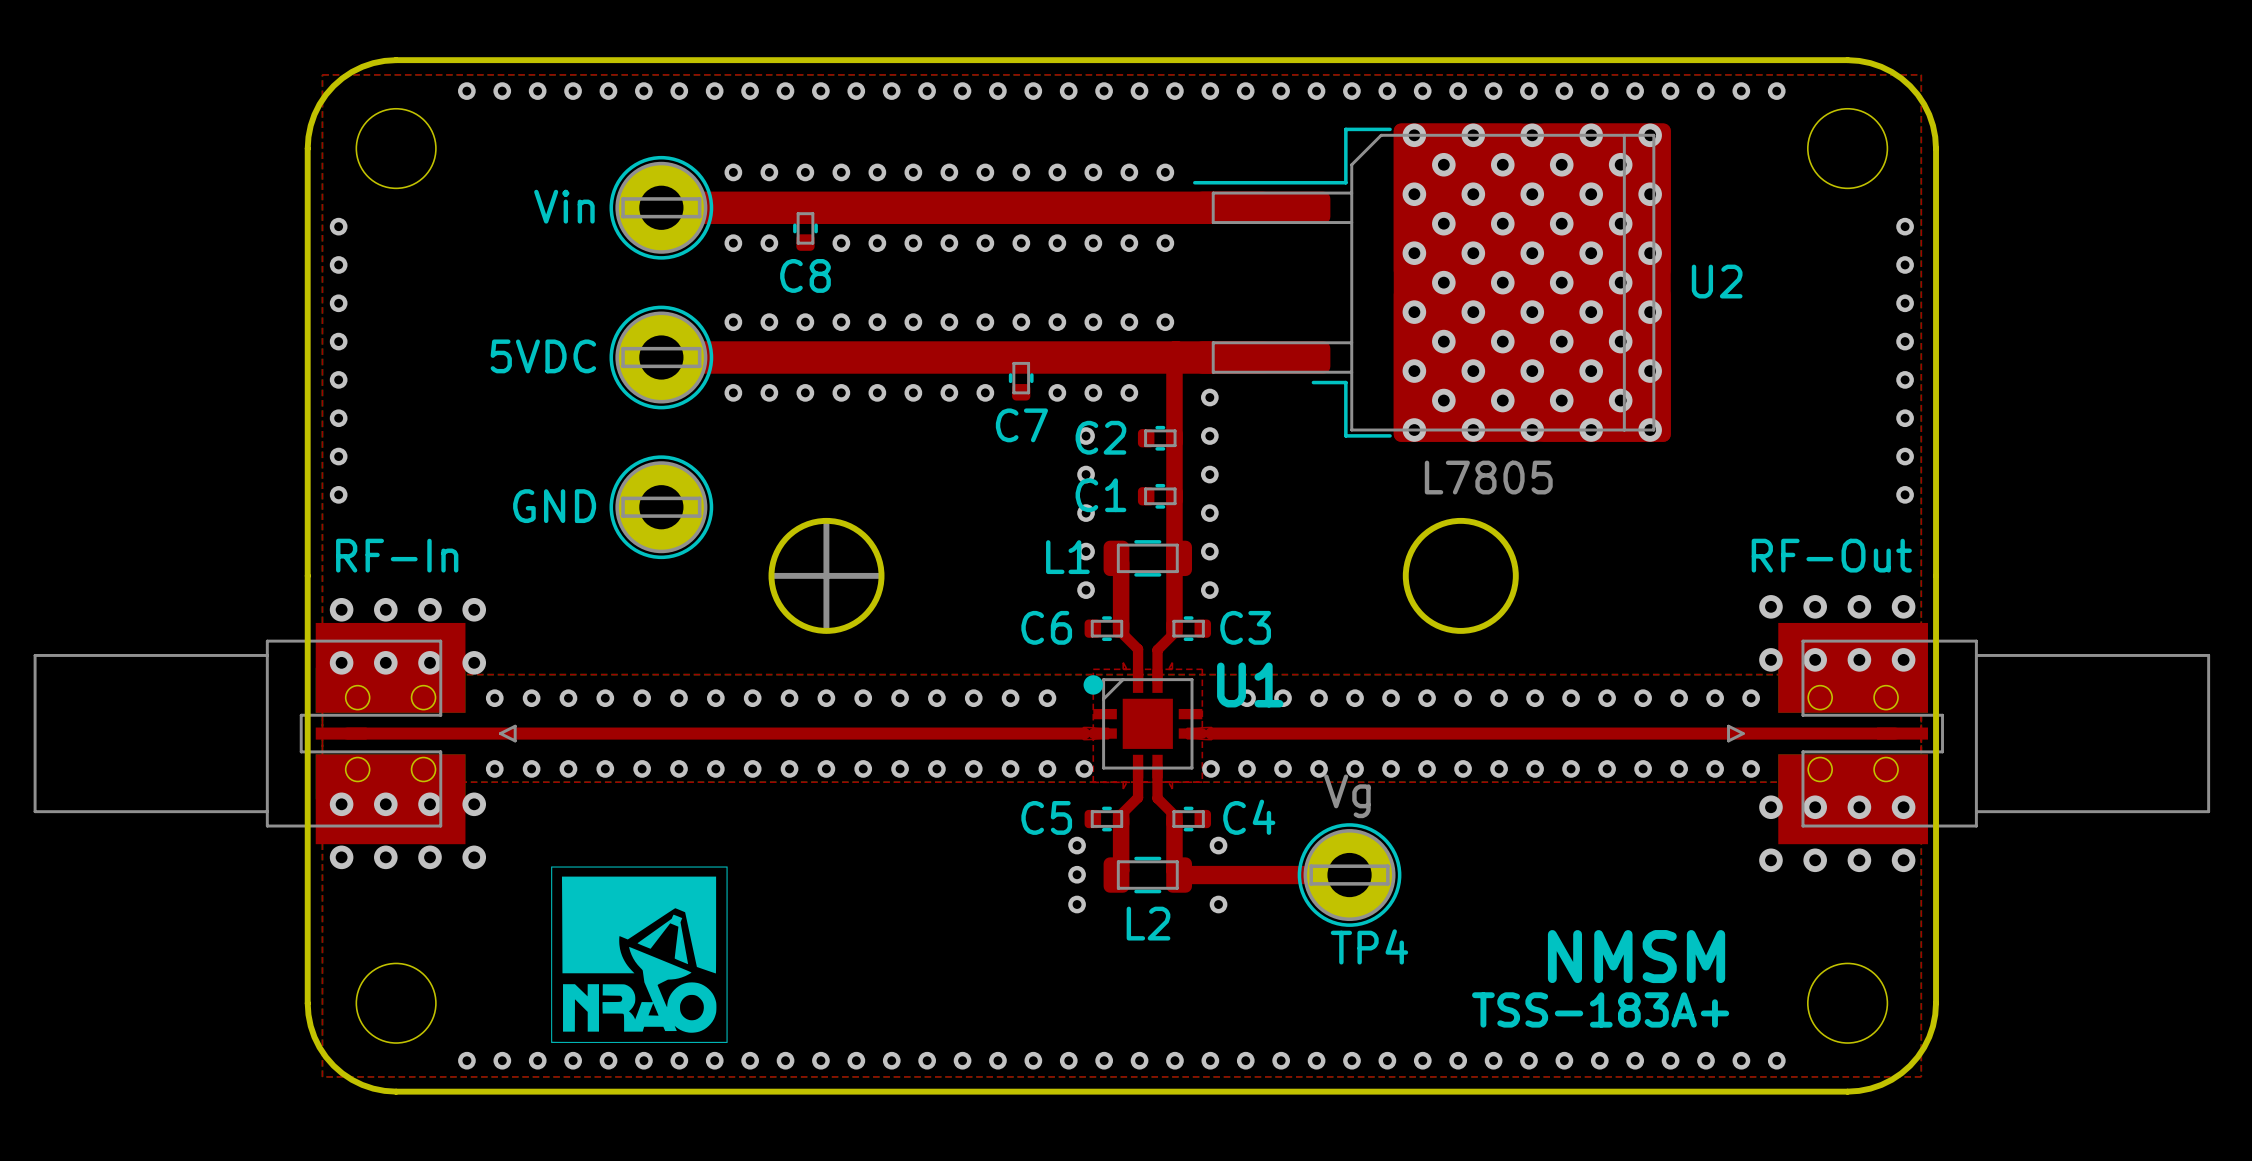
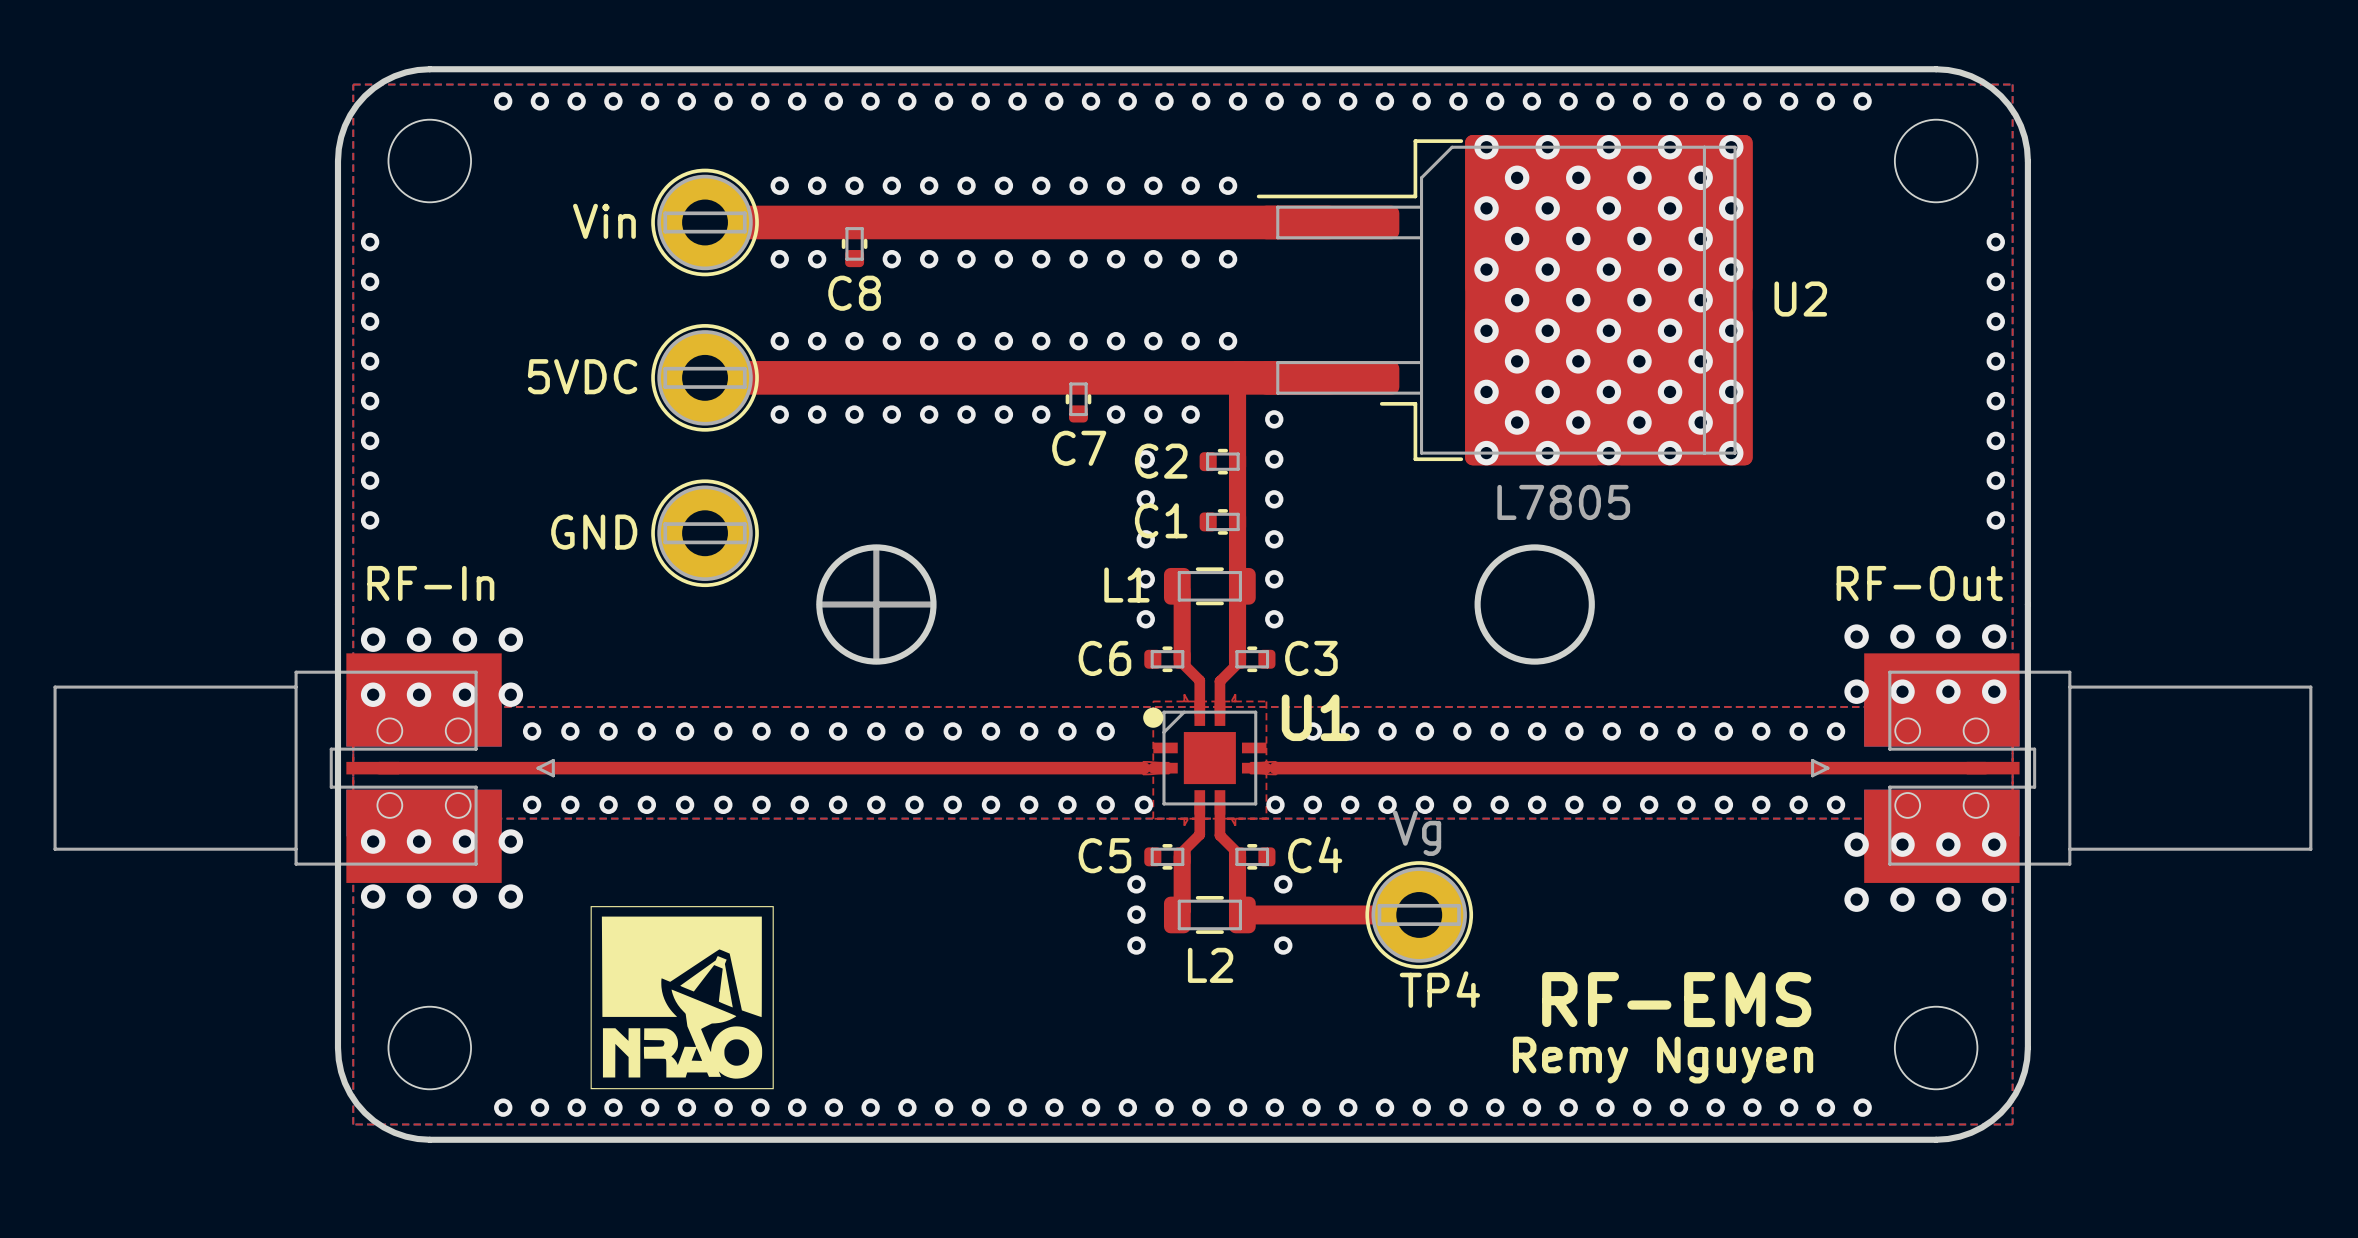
text: NMSM (1636, 956) -> RF-EMS (1676, 999)
text: TSS-183A+ (1600, 1009) -> Remy Nguyen (1663, 1060)

